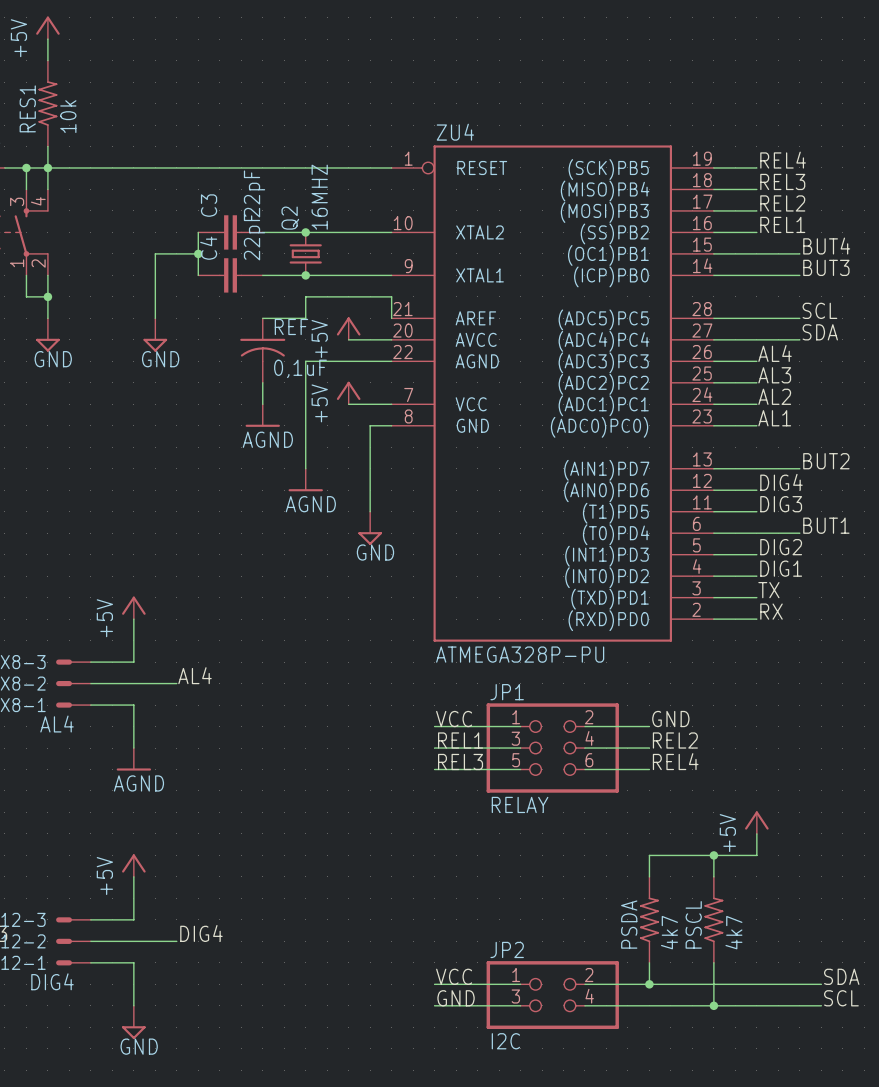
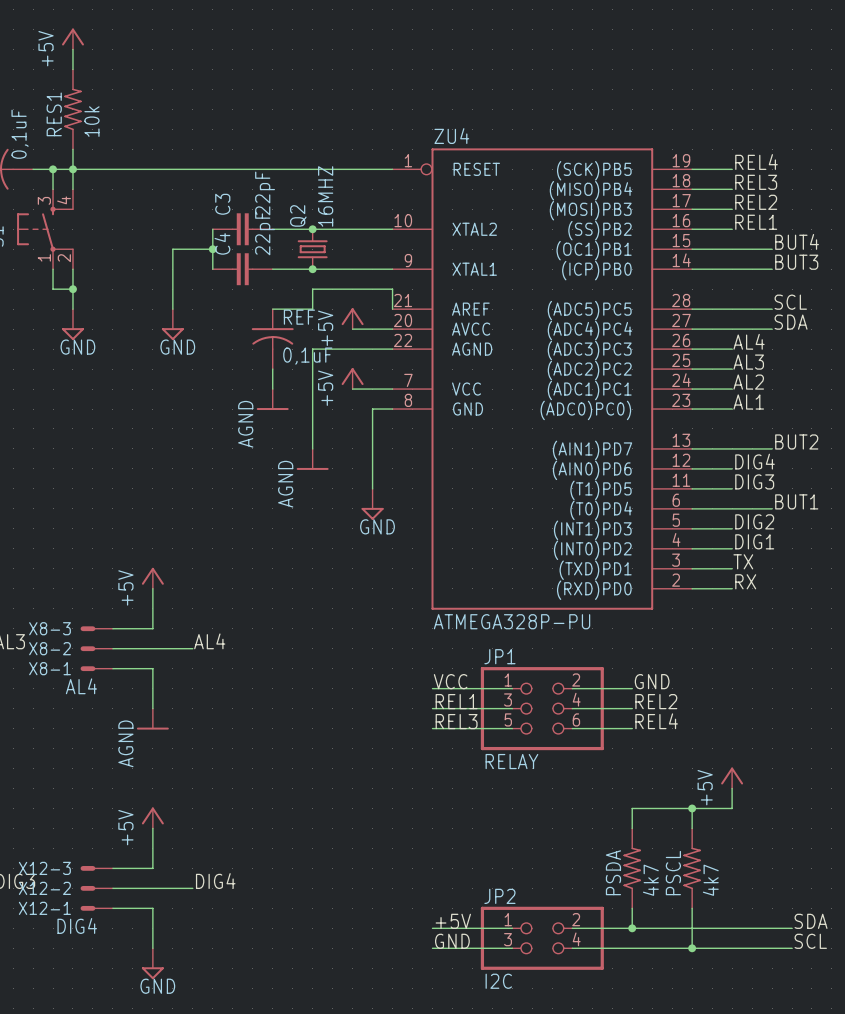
power symbol text rotation: 0° (267, 439) -> 90° counterclockwise (245, 424)
power symbol text rotation: 0° (310, 504) -> 90° counterclockwise (285, 484)
power symbol text rotation: 0° (138, 783) -> 90° counterclockwise (125, 743)
label: VCC (454, 976) -> +5V (453, 921)

